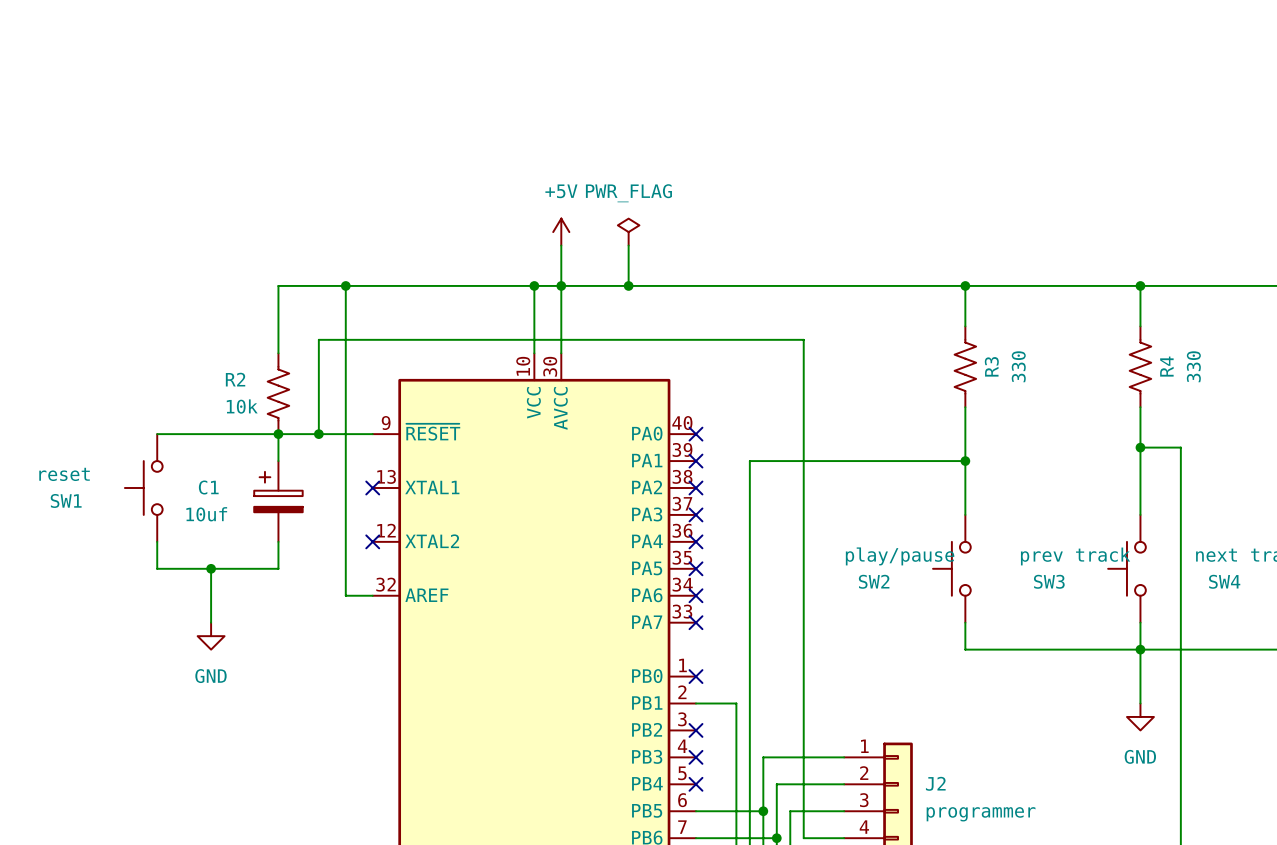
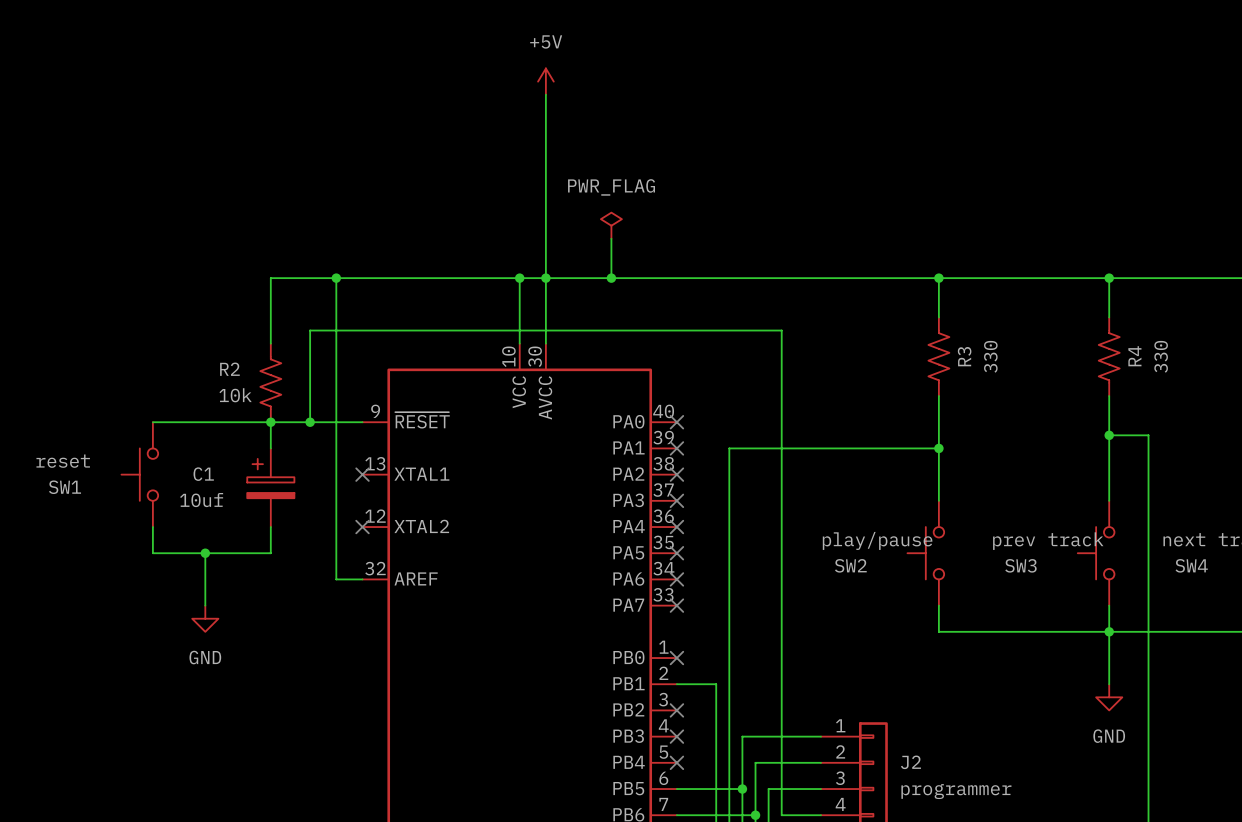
wire: none -> (545, 94) (545, 238)
power symbol position: +5V (561, 232) -> +5V (545, 81)

